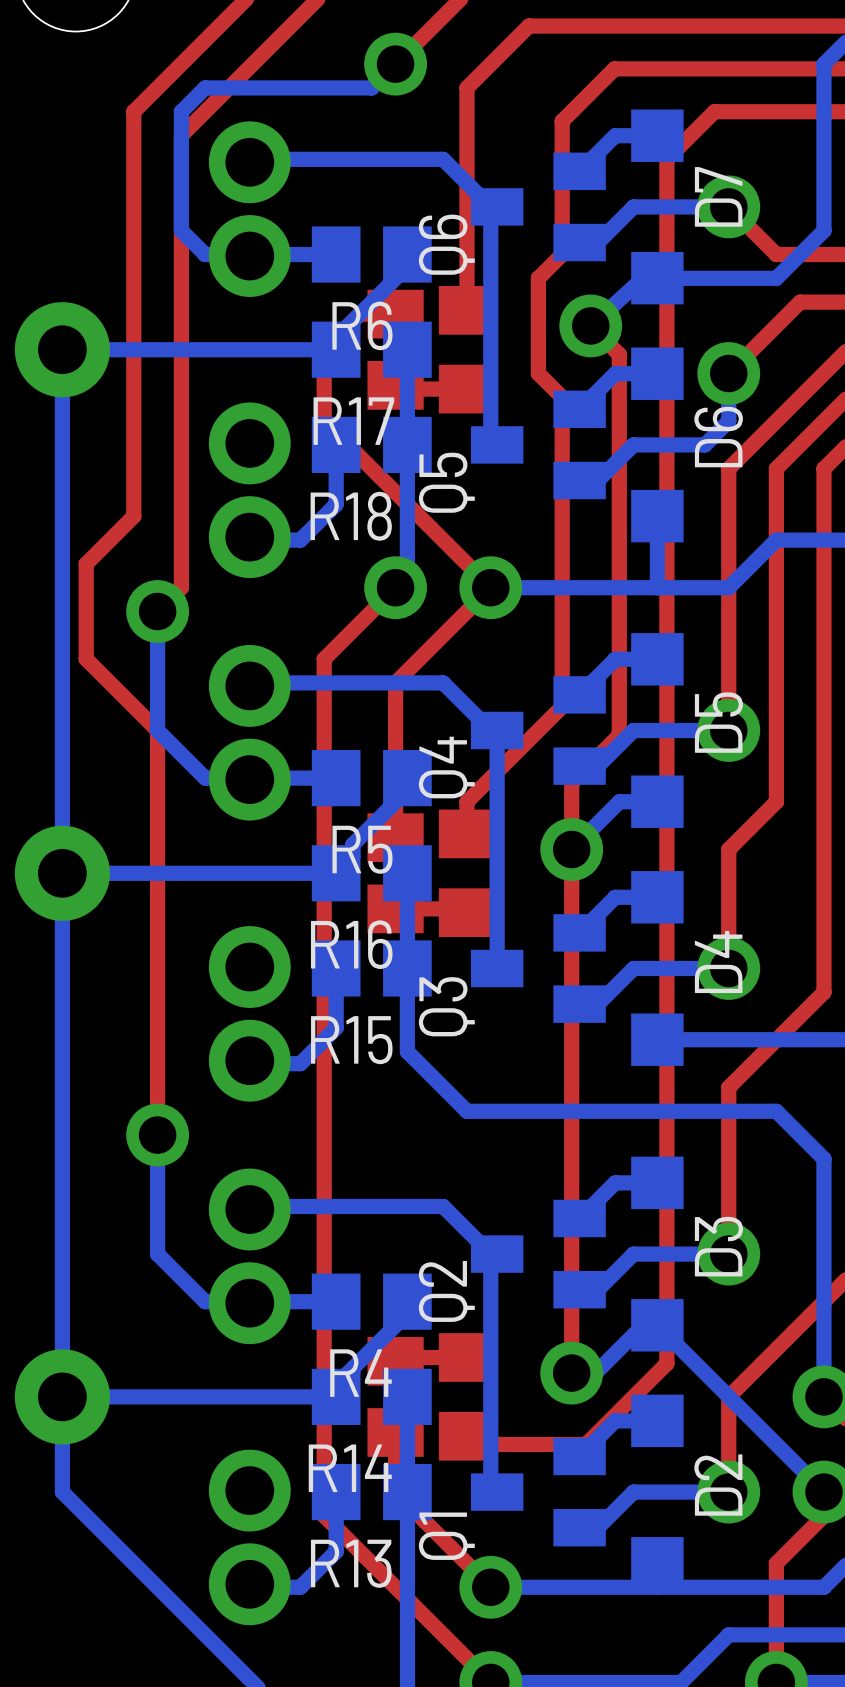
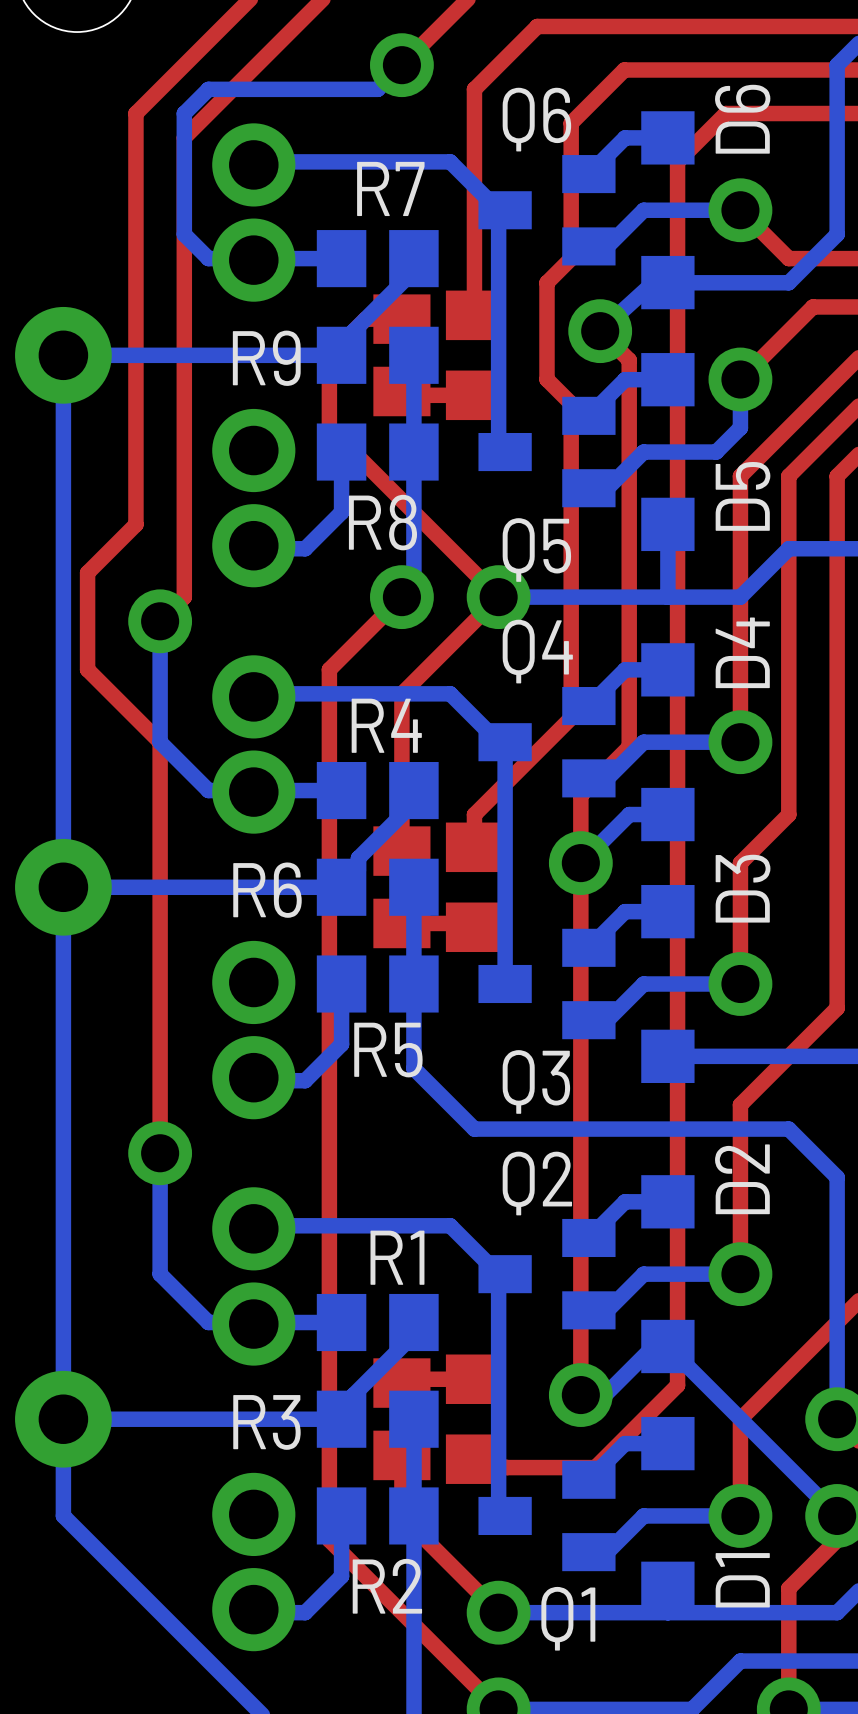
D7 name: D7 (718, 196) -> D6 (742, 119)
Q6 name rotation: 0° (446, 244) -> 90° clockwise (536, 119)
Q6 name position: Q6 (446, 244) -> Q6 (536, 119)
R6 name: R6 (362, 325) -> R7 (390, 188)
R17 name: R17 (353, 421) -> R9 (266, 358)
D6 name: D6 (718, 437) -> D5 (743, 496)
Q5 name rotation: 0° (446, 482) -> 90° clockwise (536, 550)
Q5 name position: Q5 (446, 482) -> Q5 (536, 550)
R18 name: R18 (351, 516) -> R8 (382, 522)
D5 name: D5 (718, 722) -> D4 (742, 652)
Q4 name rotation: 0° (446, 767) -> 90° clockwise (537, 651)
Q4 name position: Q4 (446, 767) -> Q4 (537, 651)
R5 name: R5 (362, 849) -> R4 (386, 725)
R16 name: R16 (351, 944) -> R6 (267, 890)
D4 name: D4 (718, 962) -> D3 (743, 888)
Q3 name rotation: 0° (446, 1006) -> 90° clockwise (536, 1081)
Q3 name position: Q3 (446, 1006) -> Q3 (536, 1081)
R15 name: R15 (351, 1040) -> R5 (388, 1050)
D3 name: D3 (718, 1246) -> D2 (742, 1179)
Q2 name rotation: 0° (446, 1291) -> 90° clockwise (537, 1183)
Q2 name position: Q2 (446, 1291) -> Q2 (537, 1183)
R4 name: R4 (361, 1373) -> R1 (397, 1257)
R14 name: R14 (350, 1468) -> R3 (266, 1422)
D2 name: D2 (718, 1485) -> D1 (742, 1580)
Q1 name rotation: 0° (446, 1536) -> 90° clockwise (568, 1618)
Q1 name position: Q1 (446, 1536) -> Q1 (568, 1618)
R13 name: R13 (351, 1563) -> R2 (387, 1586)

